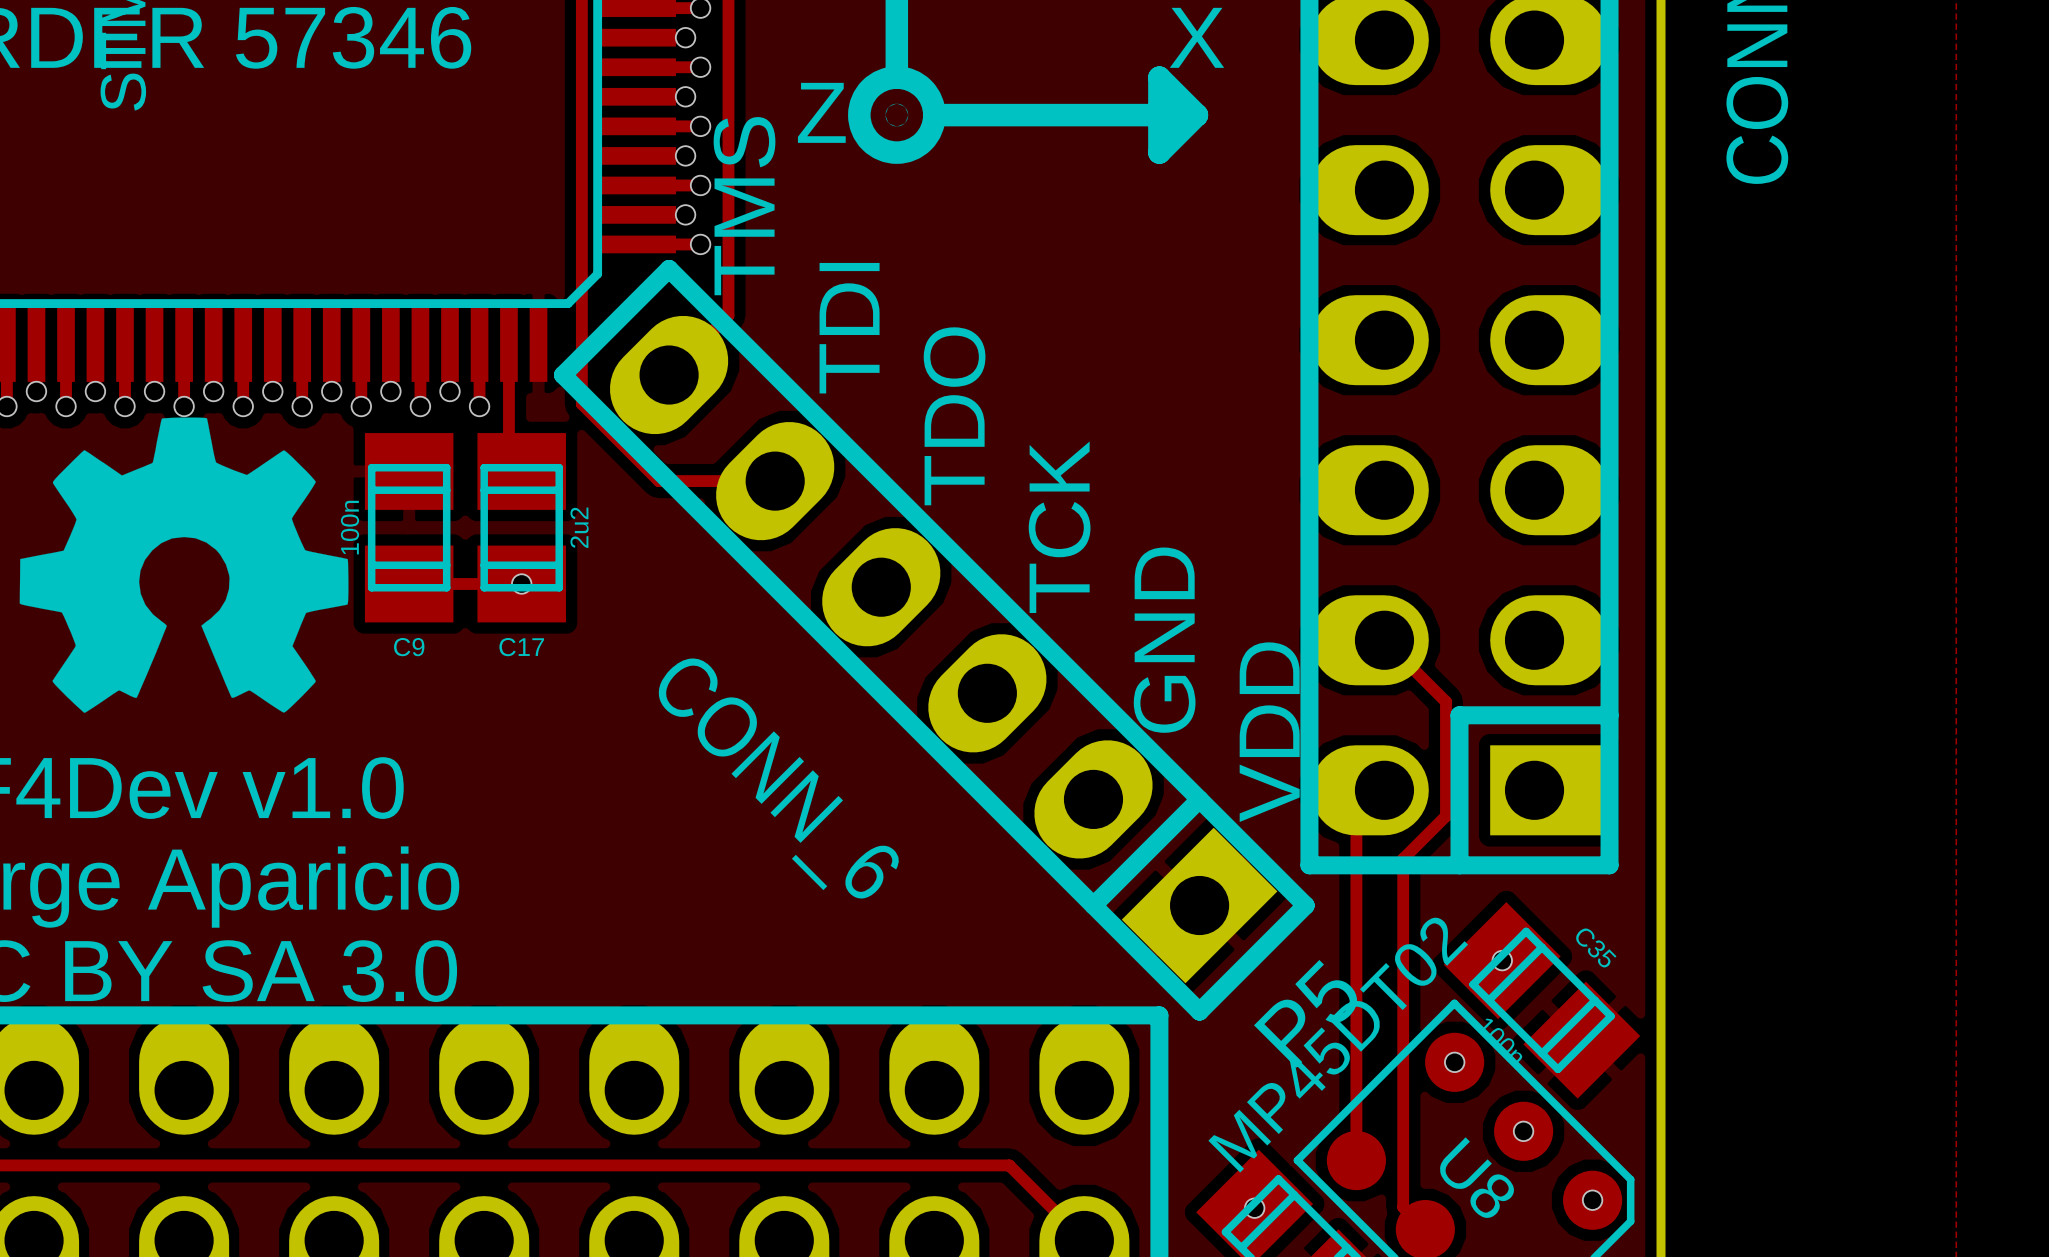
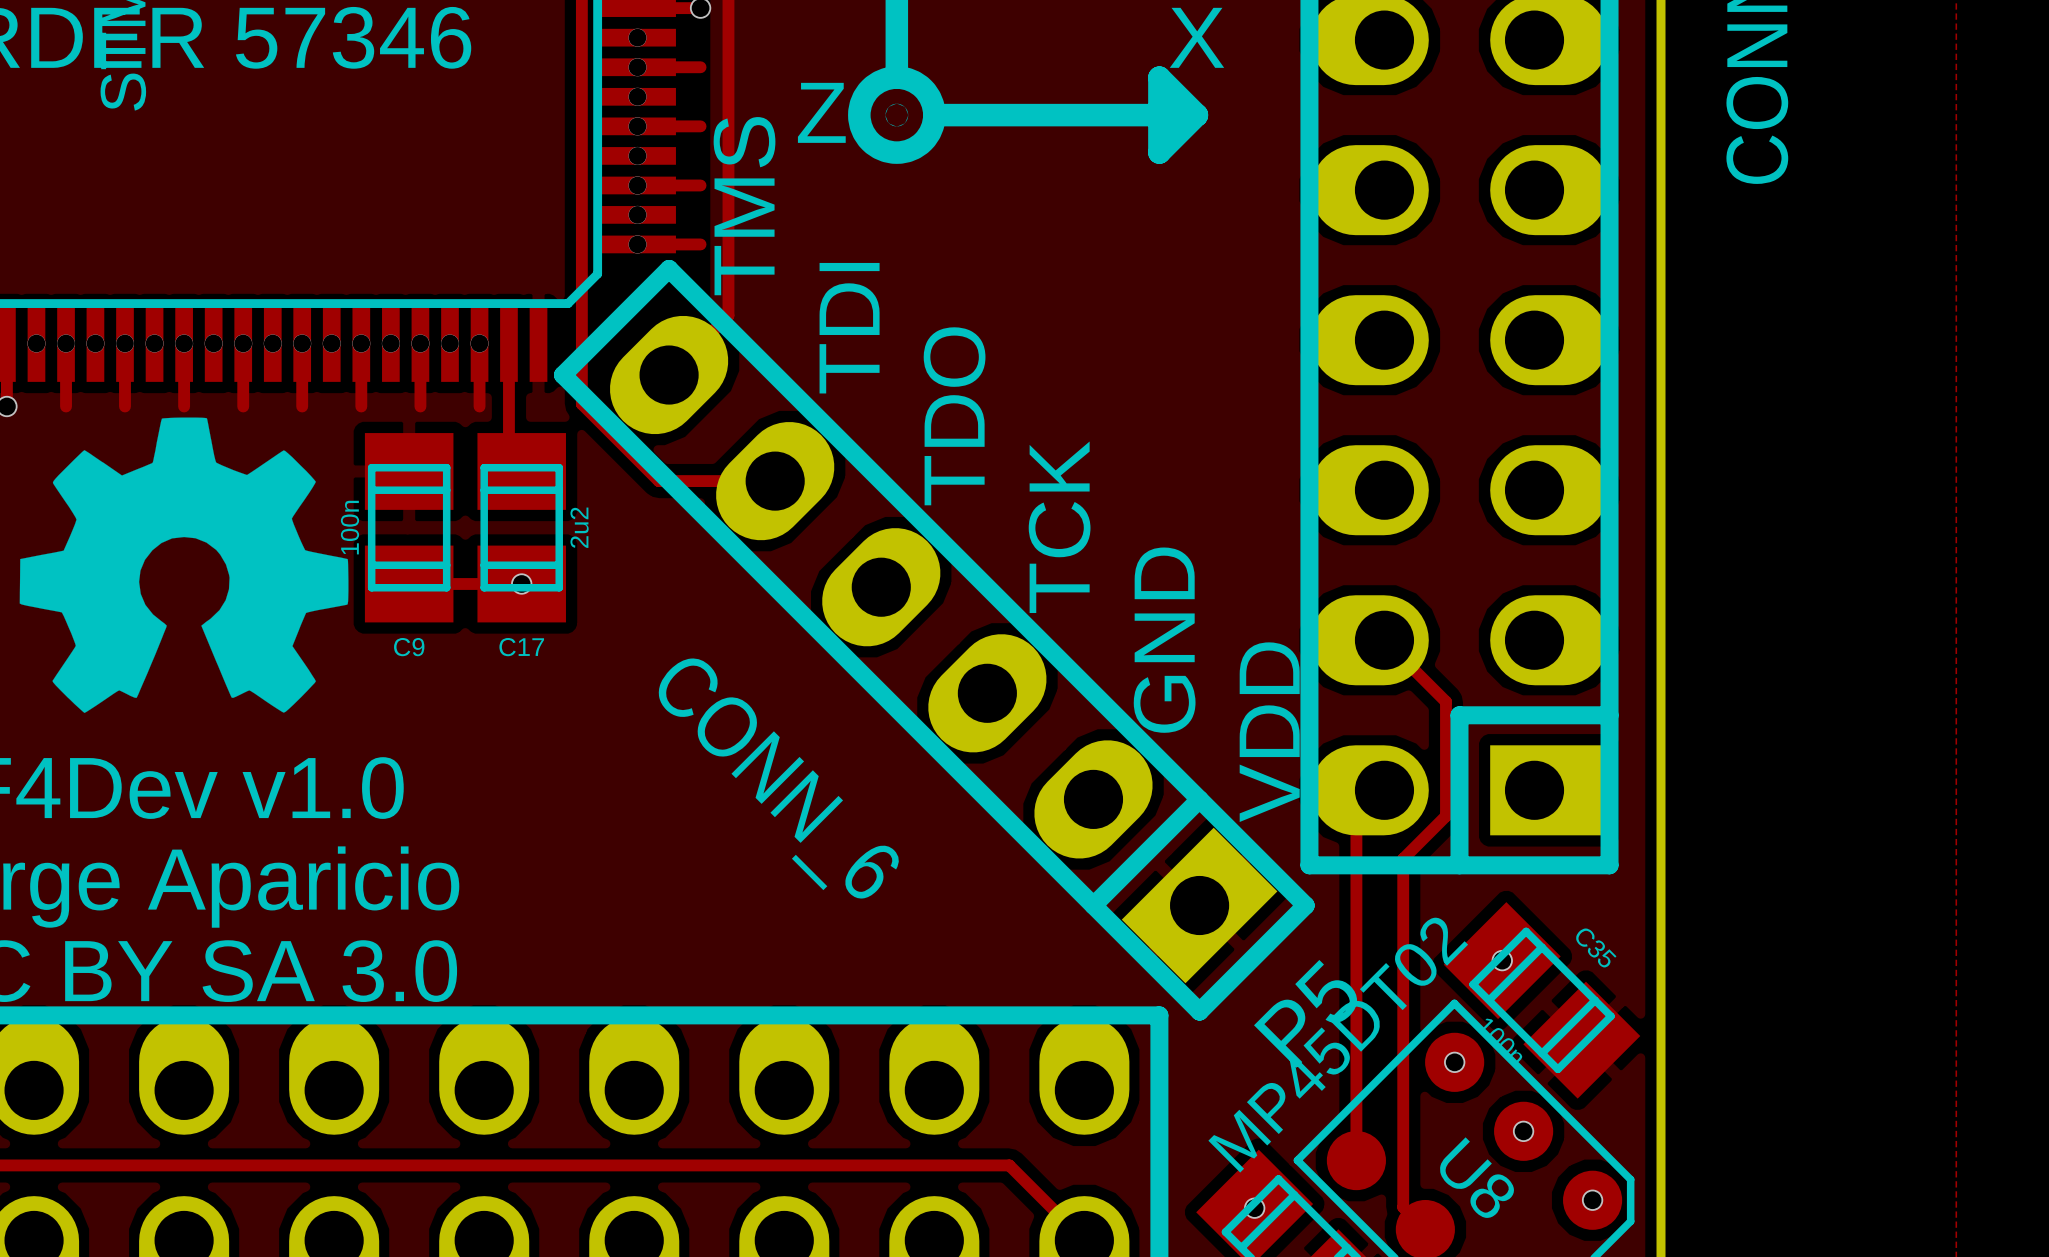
via: none -> (637, 37)
via: (685, 37) -> none
via: none -> (637, 67)
via: (700, 67) -> none
via: none -> (637, 96)
via: (685, 96) -> none
via: none -> (637, 126)
via: (700, 126) -> none
via: none -> (637, 155)
via: (685, 155) -> none
via: none -> (637, 185)
via: (700, 185) -> none
via: none -> (637, 214)
via: (685, 214) -> none
via: none -> (637, 244)
via: (700, 244) -> none
via: none -> (36, 343)
via: none -> (66, 343)
via: none -> (95, 343)
via: none -> (124, 343)
via: none -> (154, 343)
via: none -> (184, 343)
via: none -> (213, 343)
via: none -> (243, 343)
via: none -> (272, 343)
via: none -> (302, 343)
via: none -> (331, 343)
via: none -> (361, 343)
via: none -> (390, 343)
via: none -> (420, 343)
via: none -> (449, 343)
via: none -> (479, 343)
via: (36, 391) -> none
via: (95, 391) -> none
via: (154, 391) -> none
via: (213, 391) -> none
via: (272, 391) -> none
via: (331, 391) -> none
via: (390, 391) -> none
via: (449, 391) -> none
via: (66, 406) -> none
via: (124, 406) -> none
via: (184, 406) -> none
via: (243, 406) -> none
via: (302, 406) -> none
via: (361, 406) -> none
via: (420, 406) -> none
via: (479, 406) -> none

